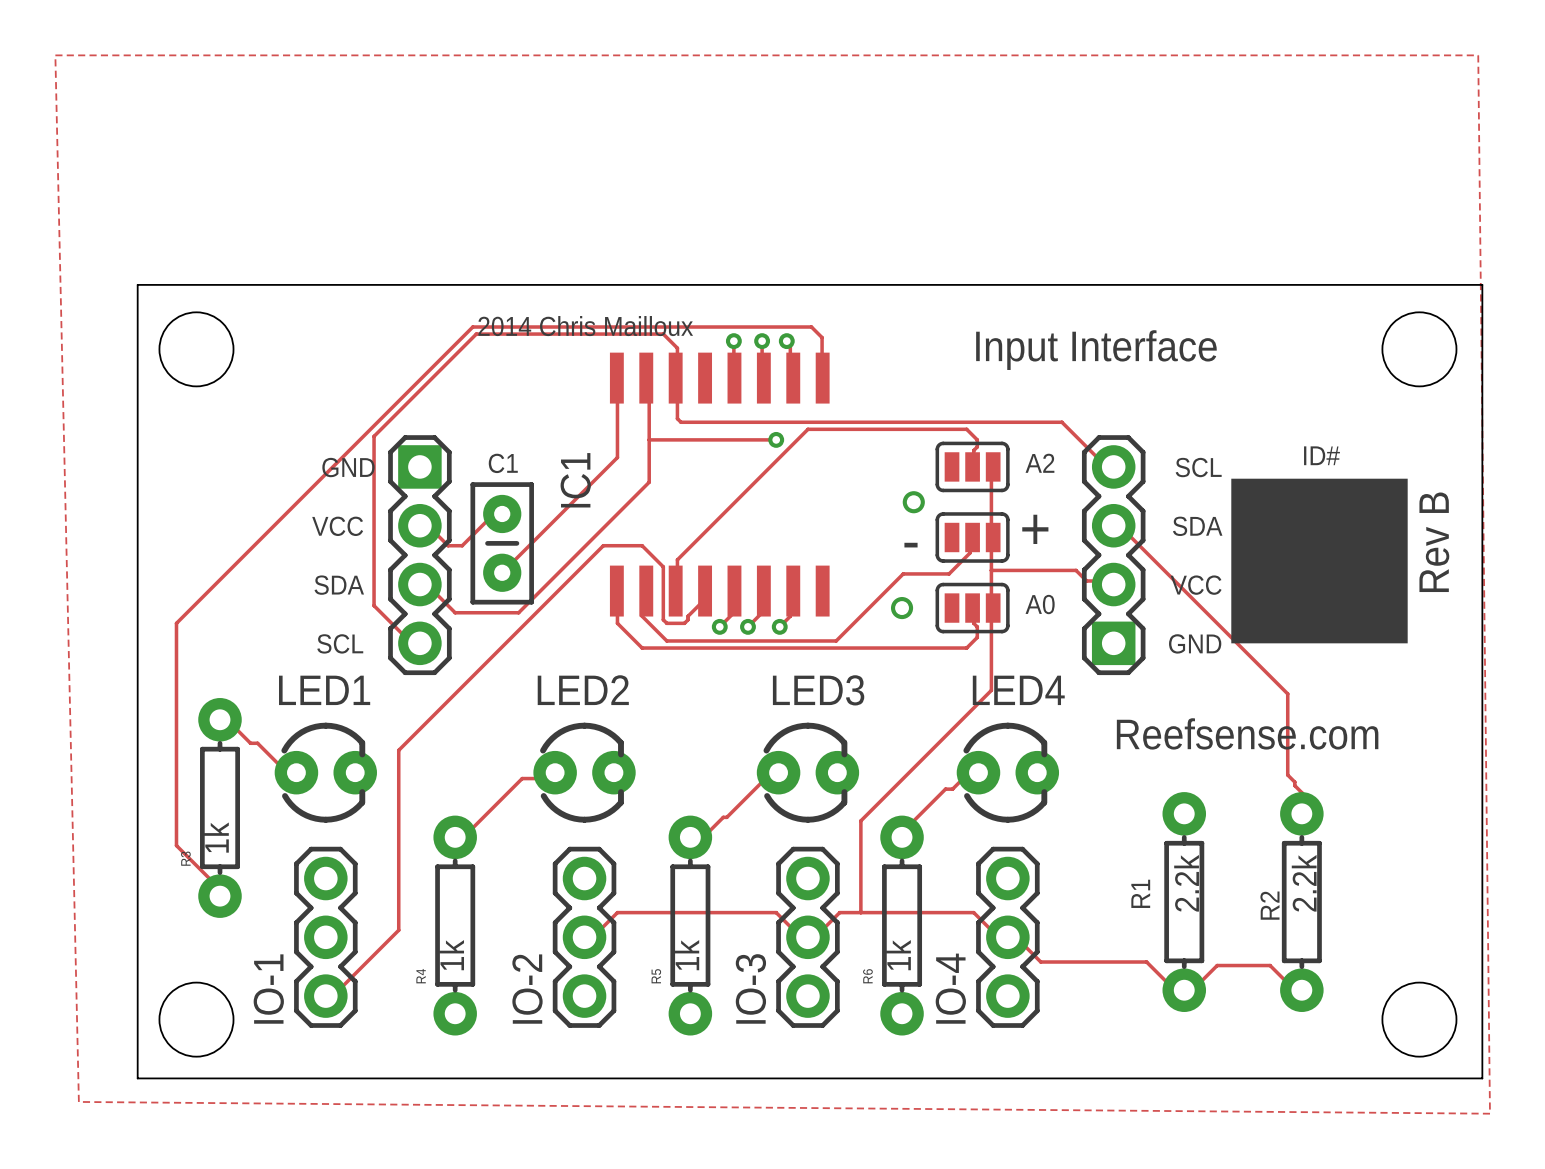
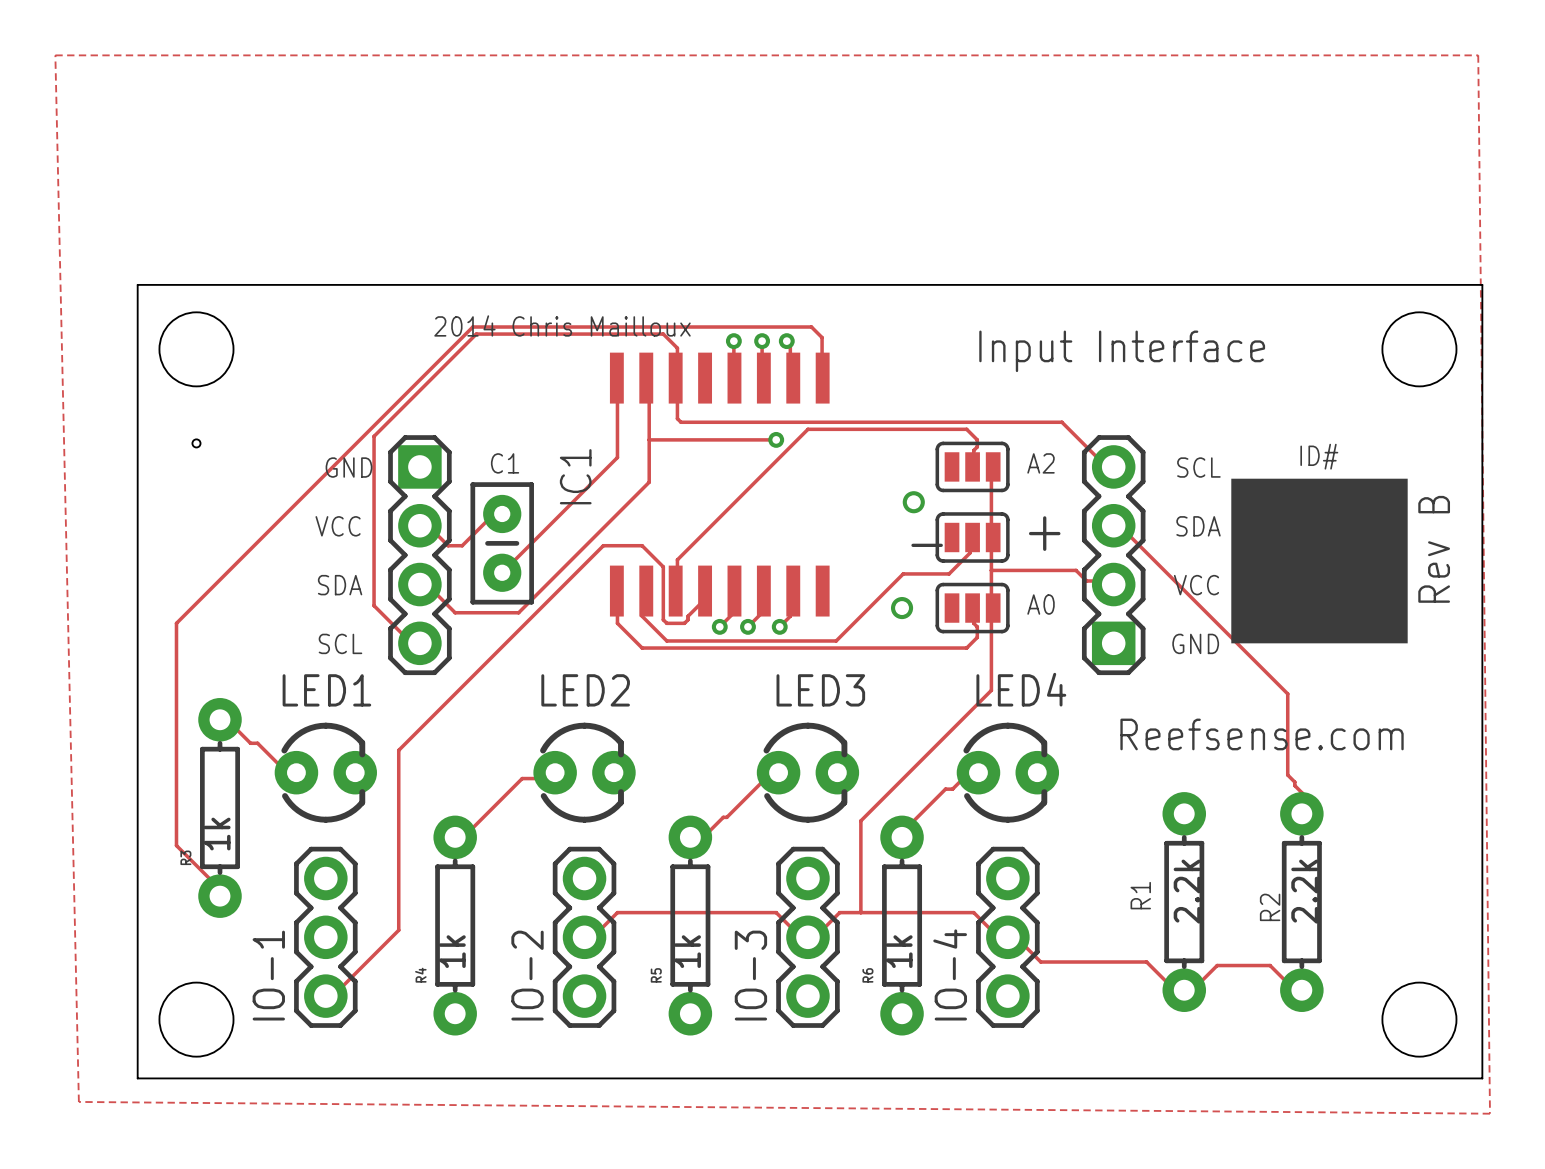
hole: none -> (196, 443)

